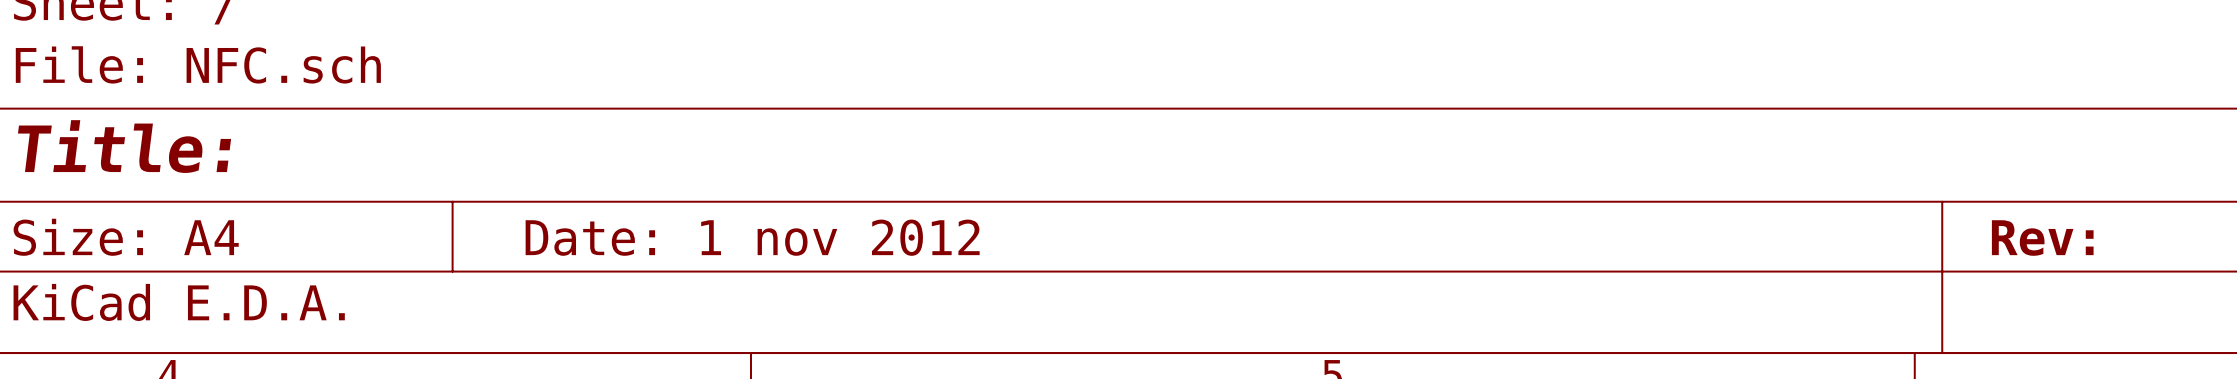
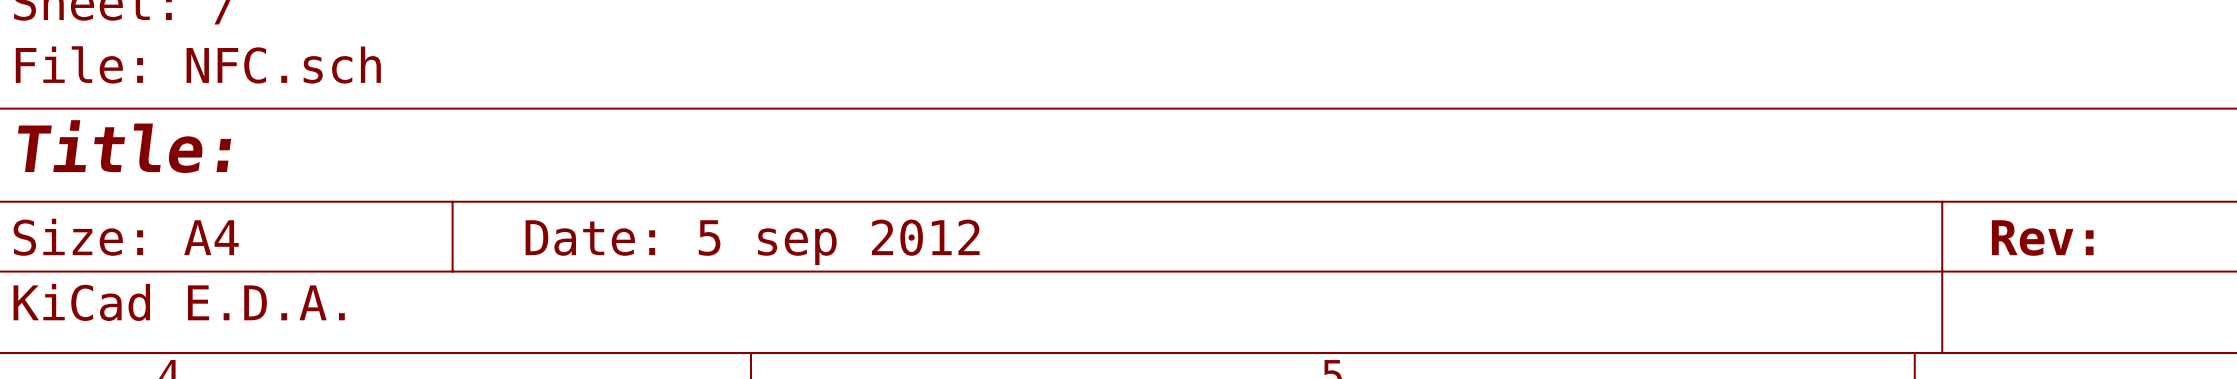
title block: Date: 1 nov 2012 (752, 237) -> Date: 5 sep 2012 (752, 242)

